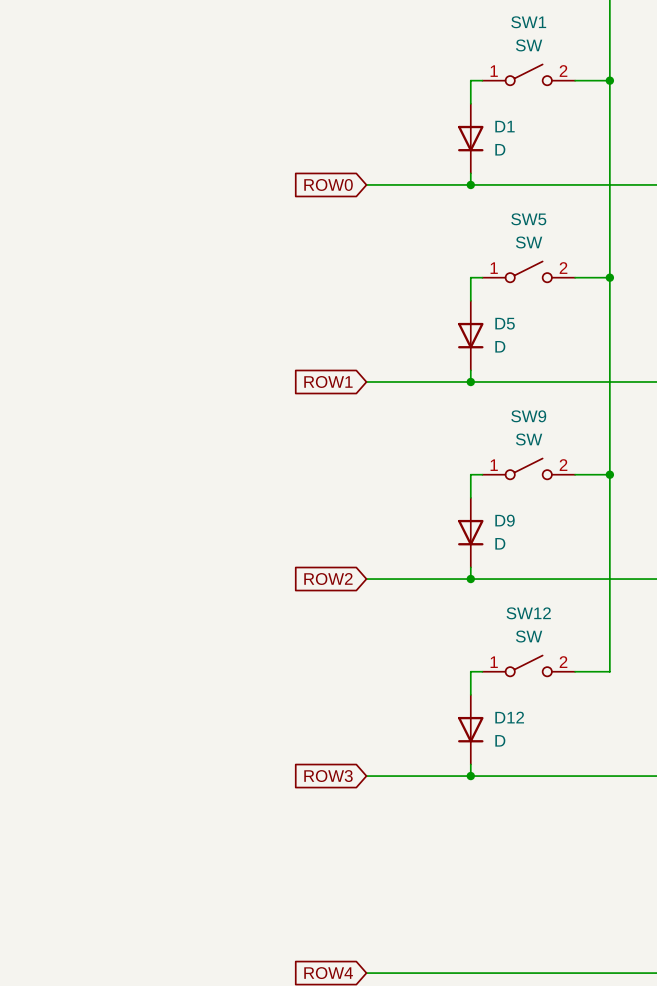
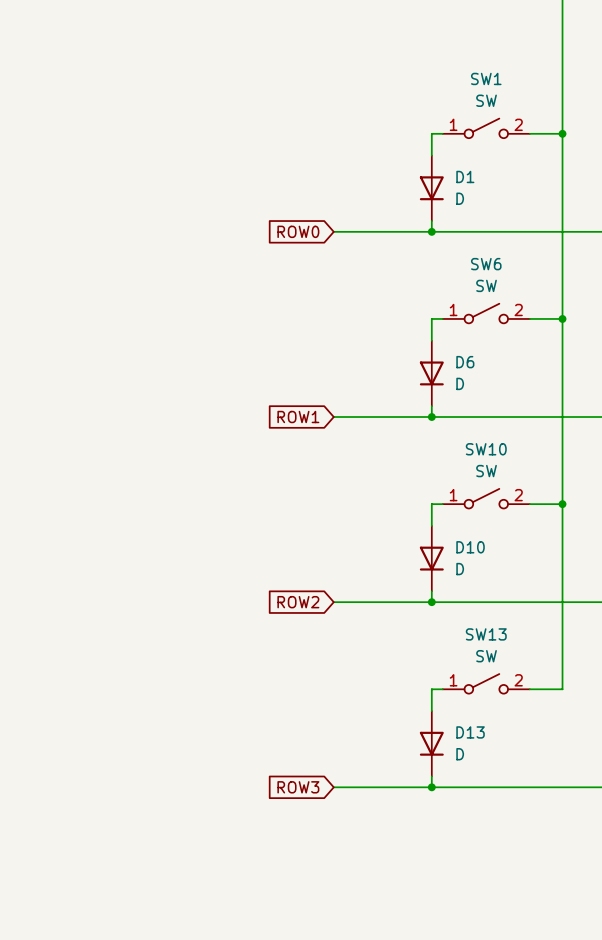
SW5 name: SW5 (528, 219) -> SW6 (486, 264)
D5 name: D5 (505, 323) -> D6 (465, 362)
SW9 name: SW9 (528, 416) -> SW10 (486, 449)
D9 name: D9 (505, 520) -> D10 (470, 547)
SW12 name: SW12 (528, 613) -> SW13 (486, 634)
D12 name: D12 (509, 717) -> D13 (470, 732)

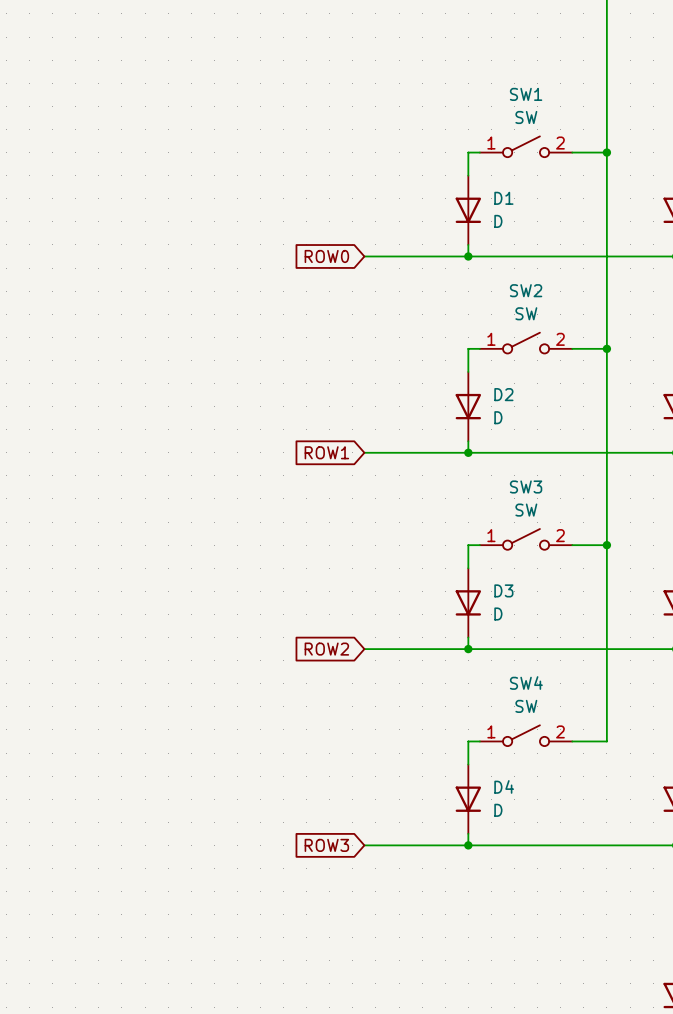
SW6 name: SW6 (486, 264) -> SW2 (526, 290)
D6 name: D6 (465, 362) -> D2 (503, 394)
SW10 name: SW10 (486, 449) -> SW3 (526, 486)
D10 name: D10 (470, 547) -> D3 (503, 590)
SW13 name: SW13 (486, 634) -> SW4 (526, 683)
D13 name: D13 (470, 732) -> D4 (504, 786)

